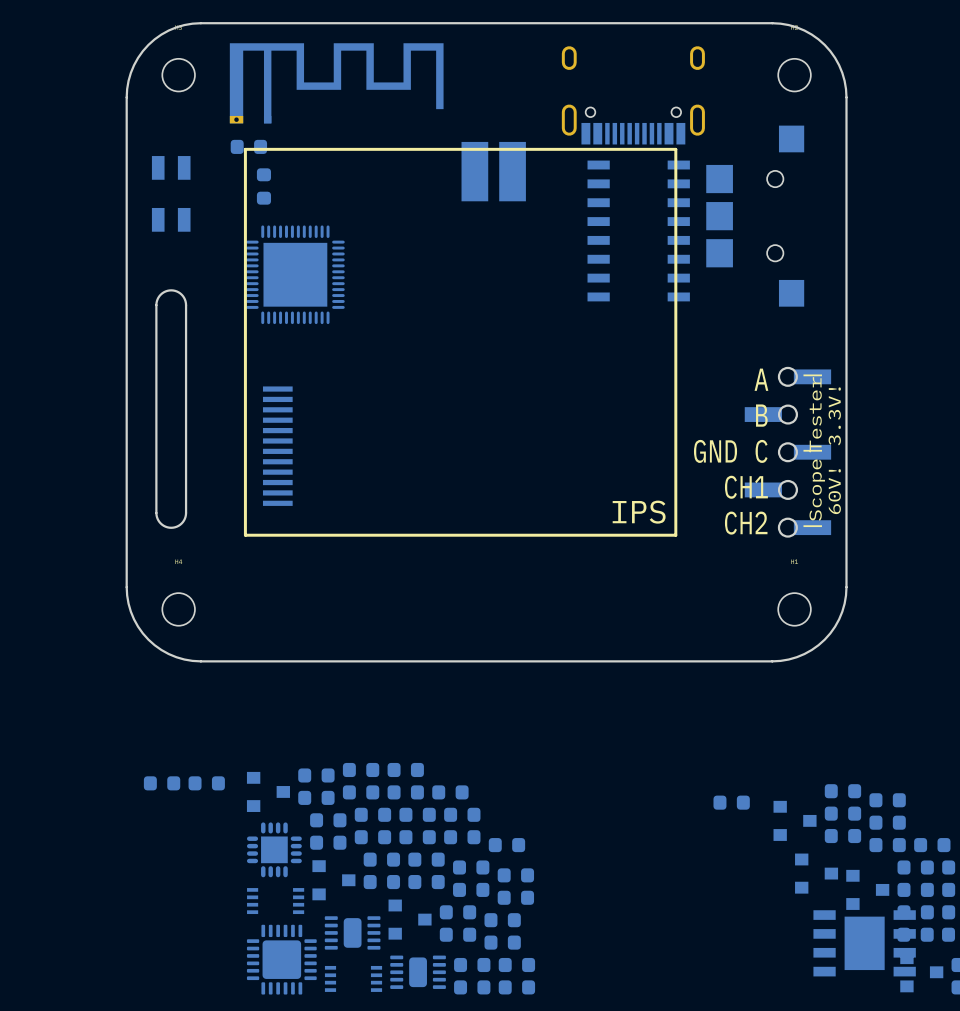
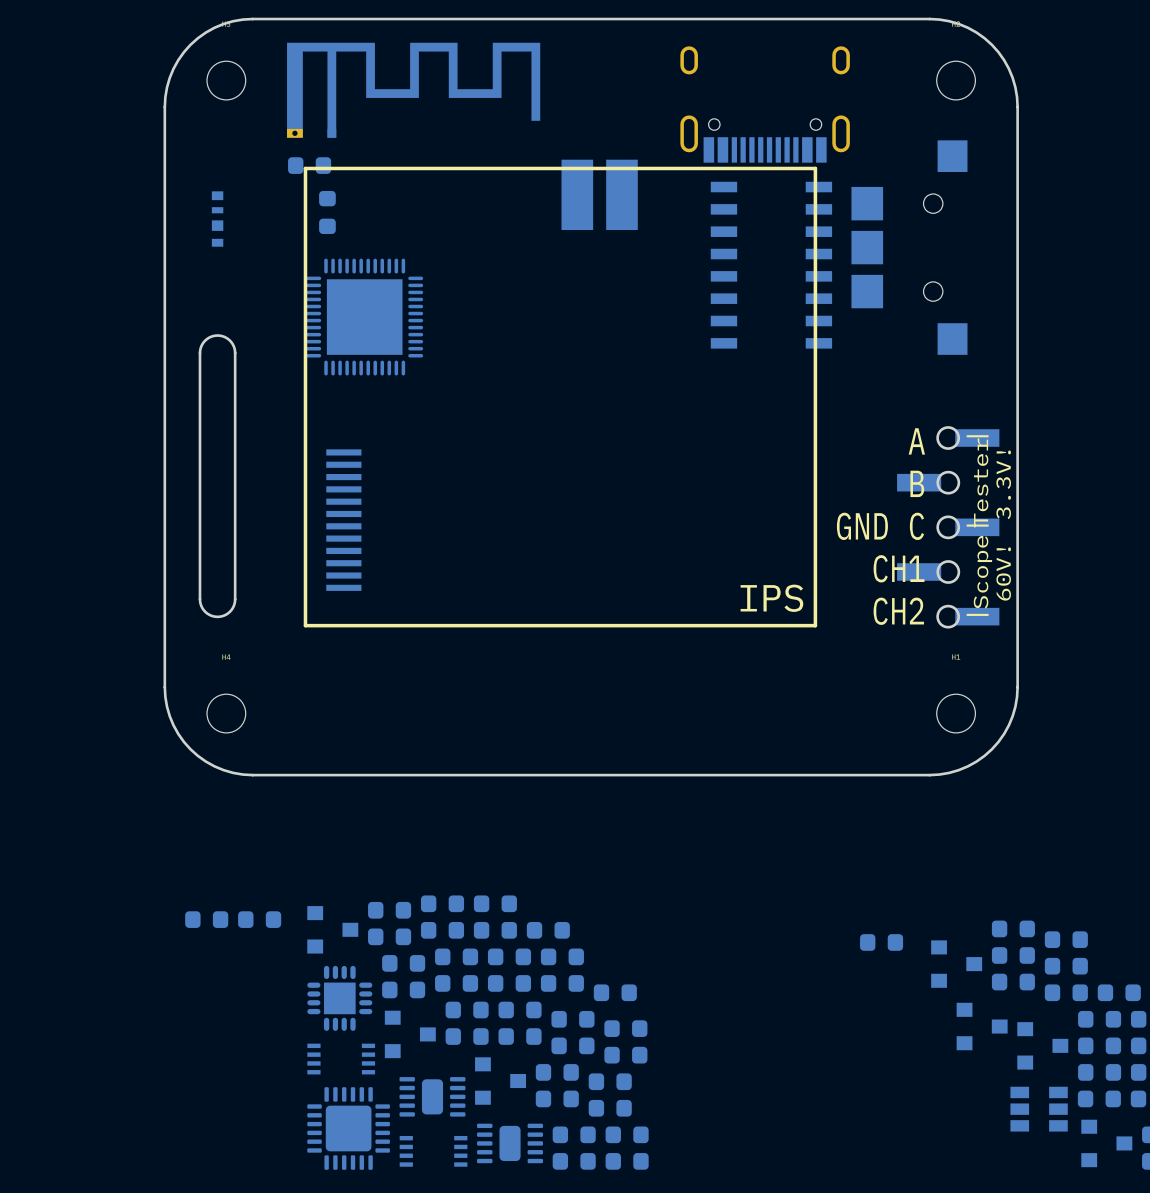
part footprint: [151, 156, 191, 232] -> [211, 191, 224, 247]
part footprint: [813, 910, 916, 977] -> [1010, 1086, 1068, 1132]

